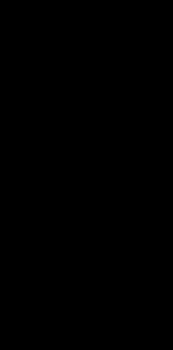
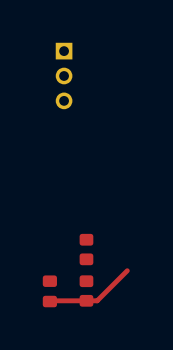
part: none -> (64, 75)
part: none -> (86, 249)
top track: none -> (127, 270) (97, 300) (49, 301)
part: none -> (49, 291)
part: none -> (86, 291)

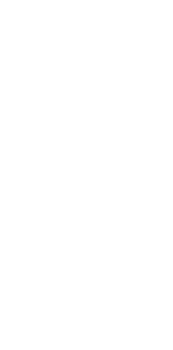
part: (64, 75) -> none
part: (86, 249) -> none
top track: (127, 270) (97, 300) (49, 301) -> none
part: (49, 291) -> none
part: (86, 291) -> none

